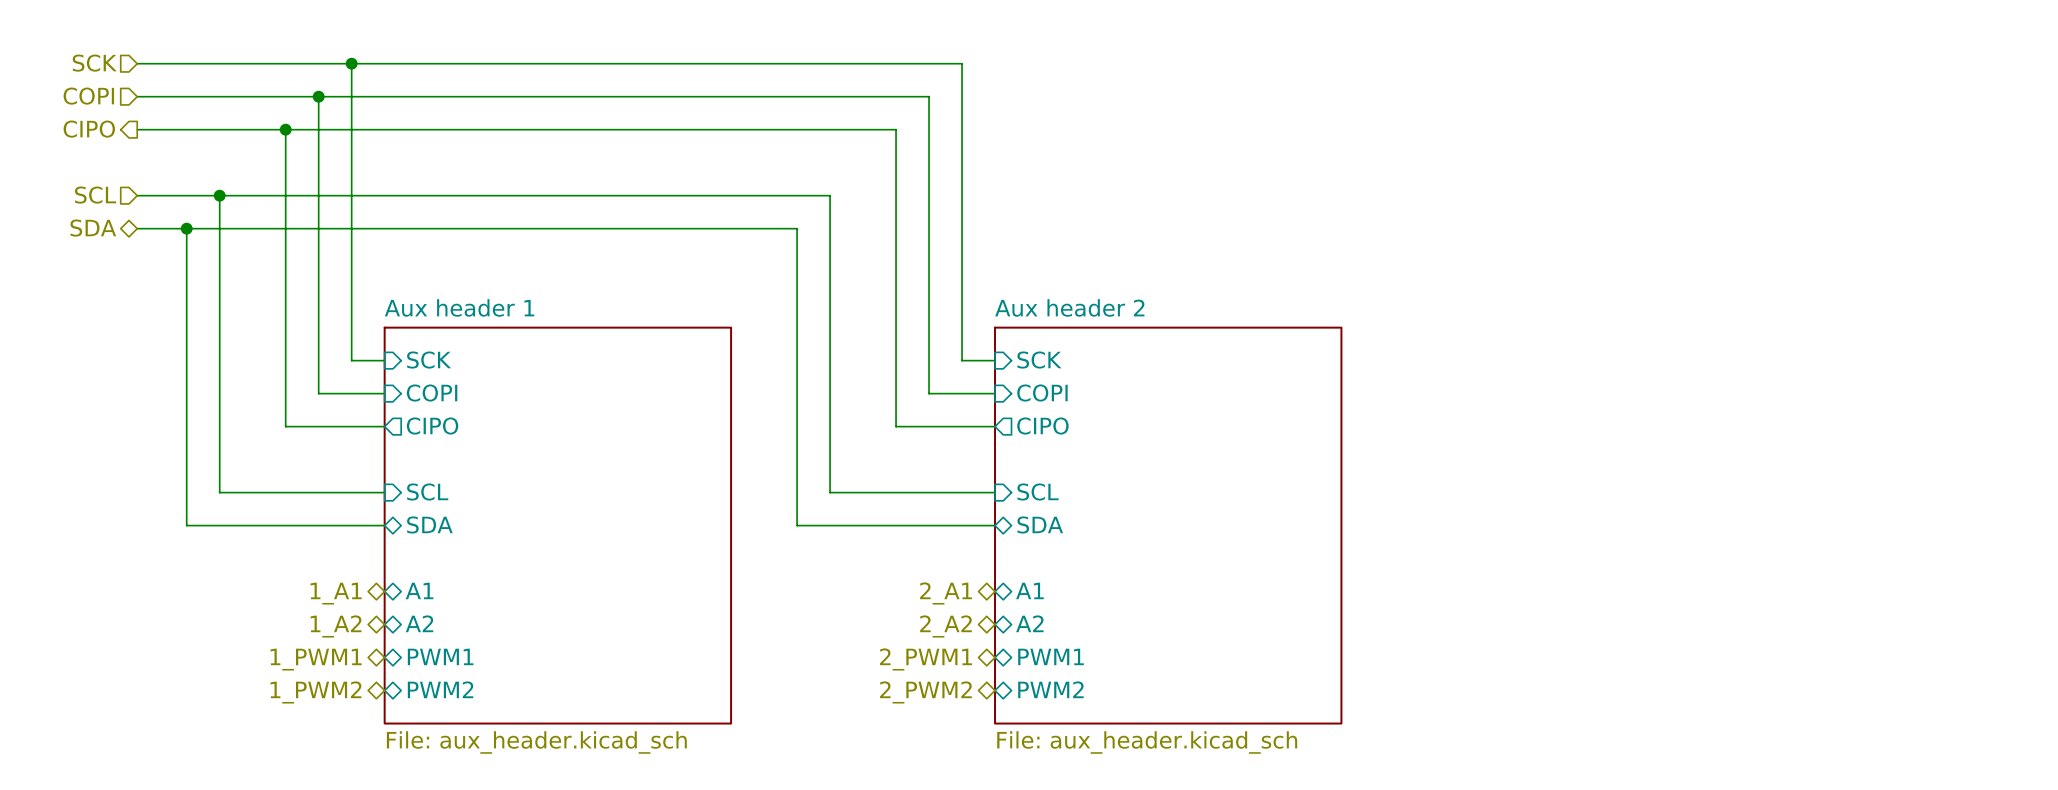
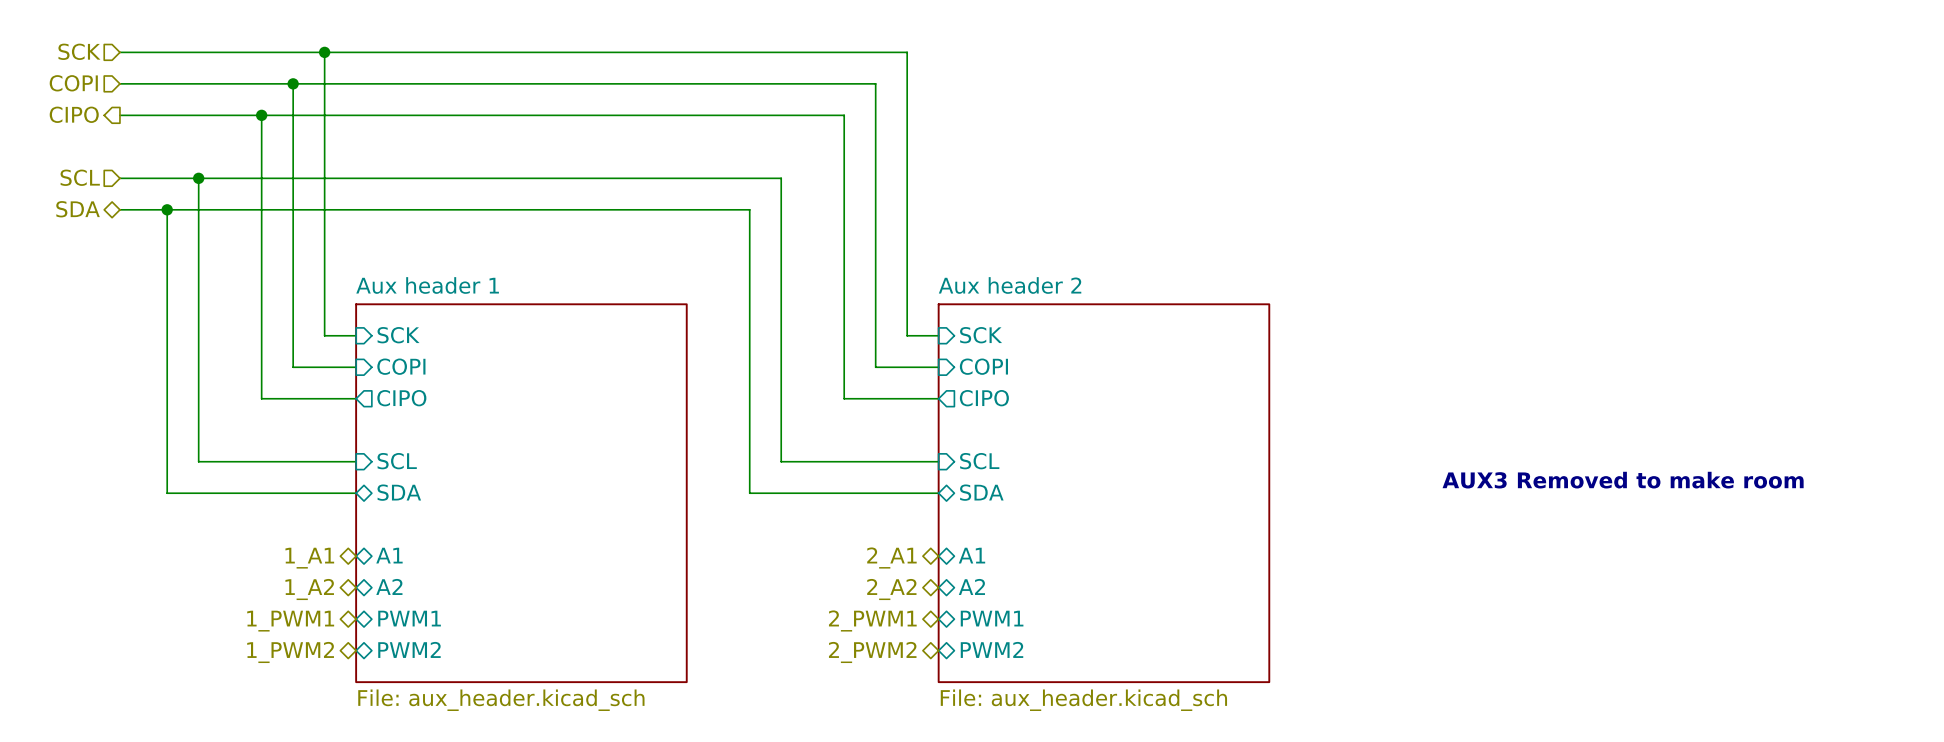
text: none -> AUX3 Removed to make room (1623, 480)

